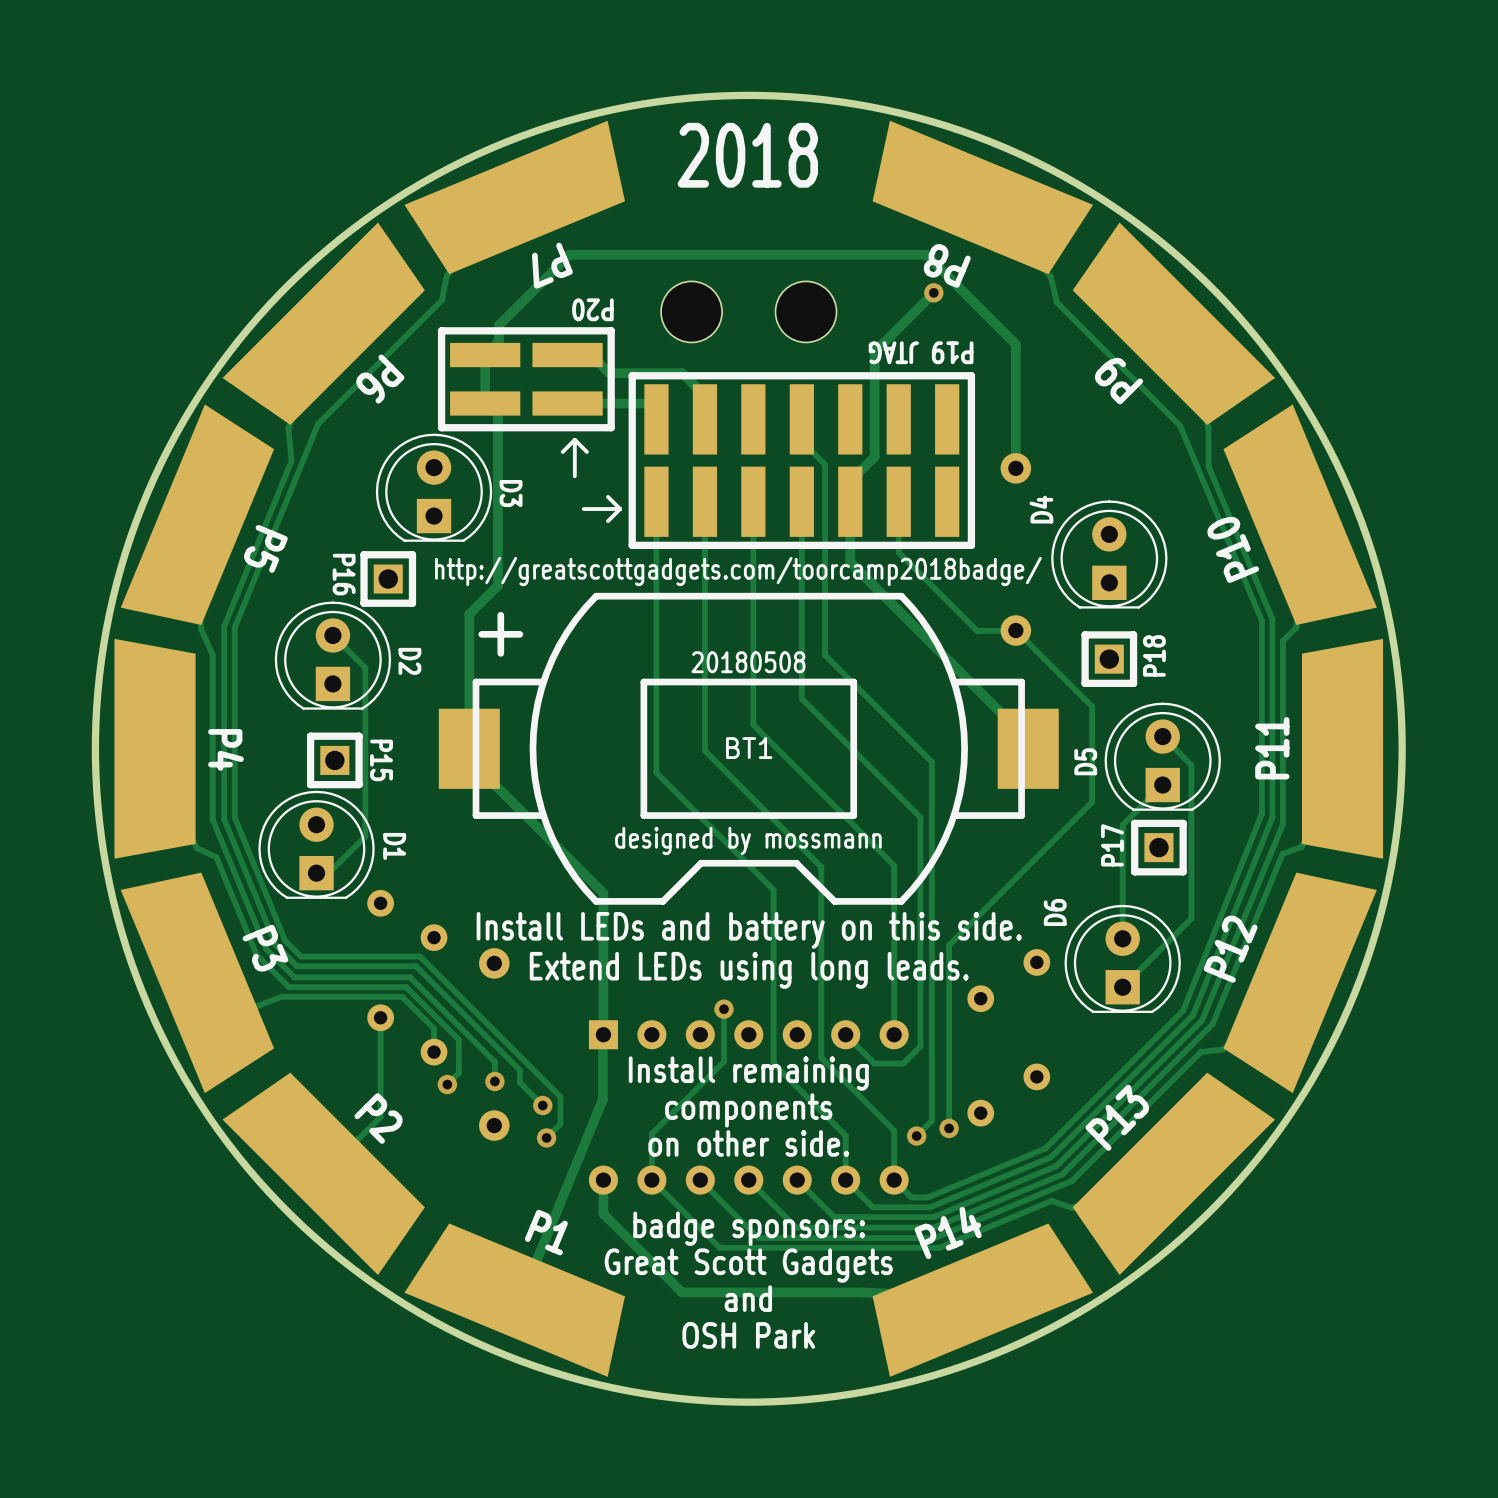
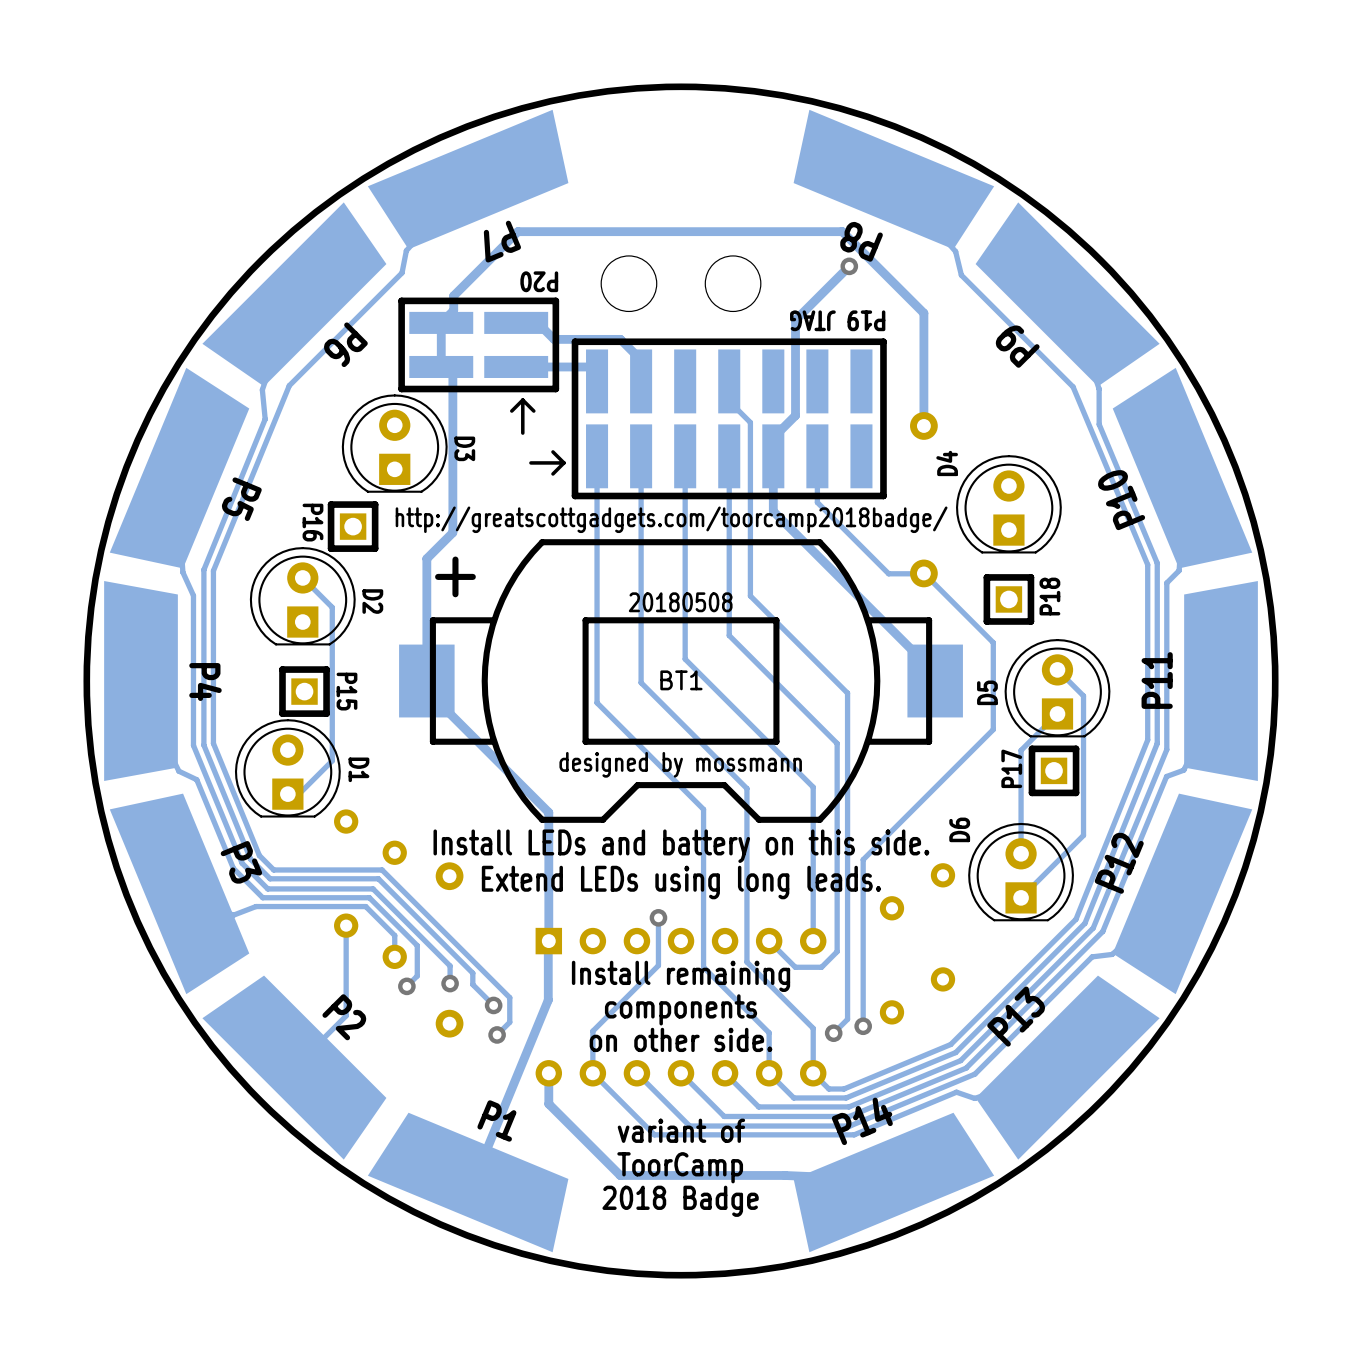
text: 2018 (747, 155) -> none
text: badge sponsors: (749, 1228) -> none
text: none -> variant of (681, 1130)
text: Great Scott Gadgets (748, 1265) -> none
text: none -> ToorCamp (680, 1167)
text: and (748, 1298) -> none
text: none -> 2018 Badge (680, 1201)
text: OSH Park (748, 1335) -> none

